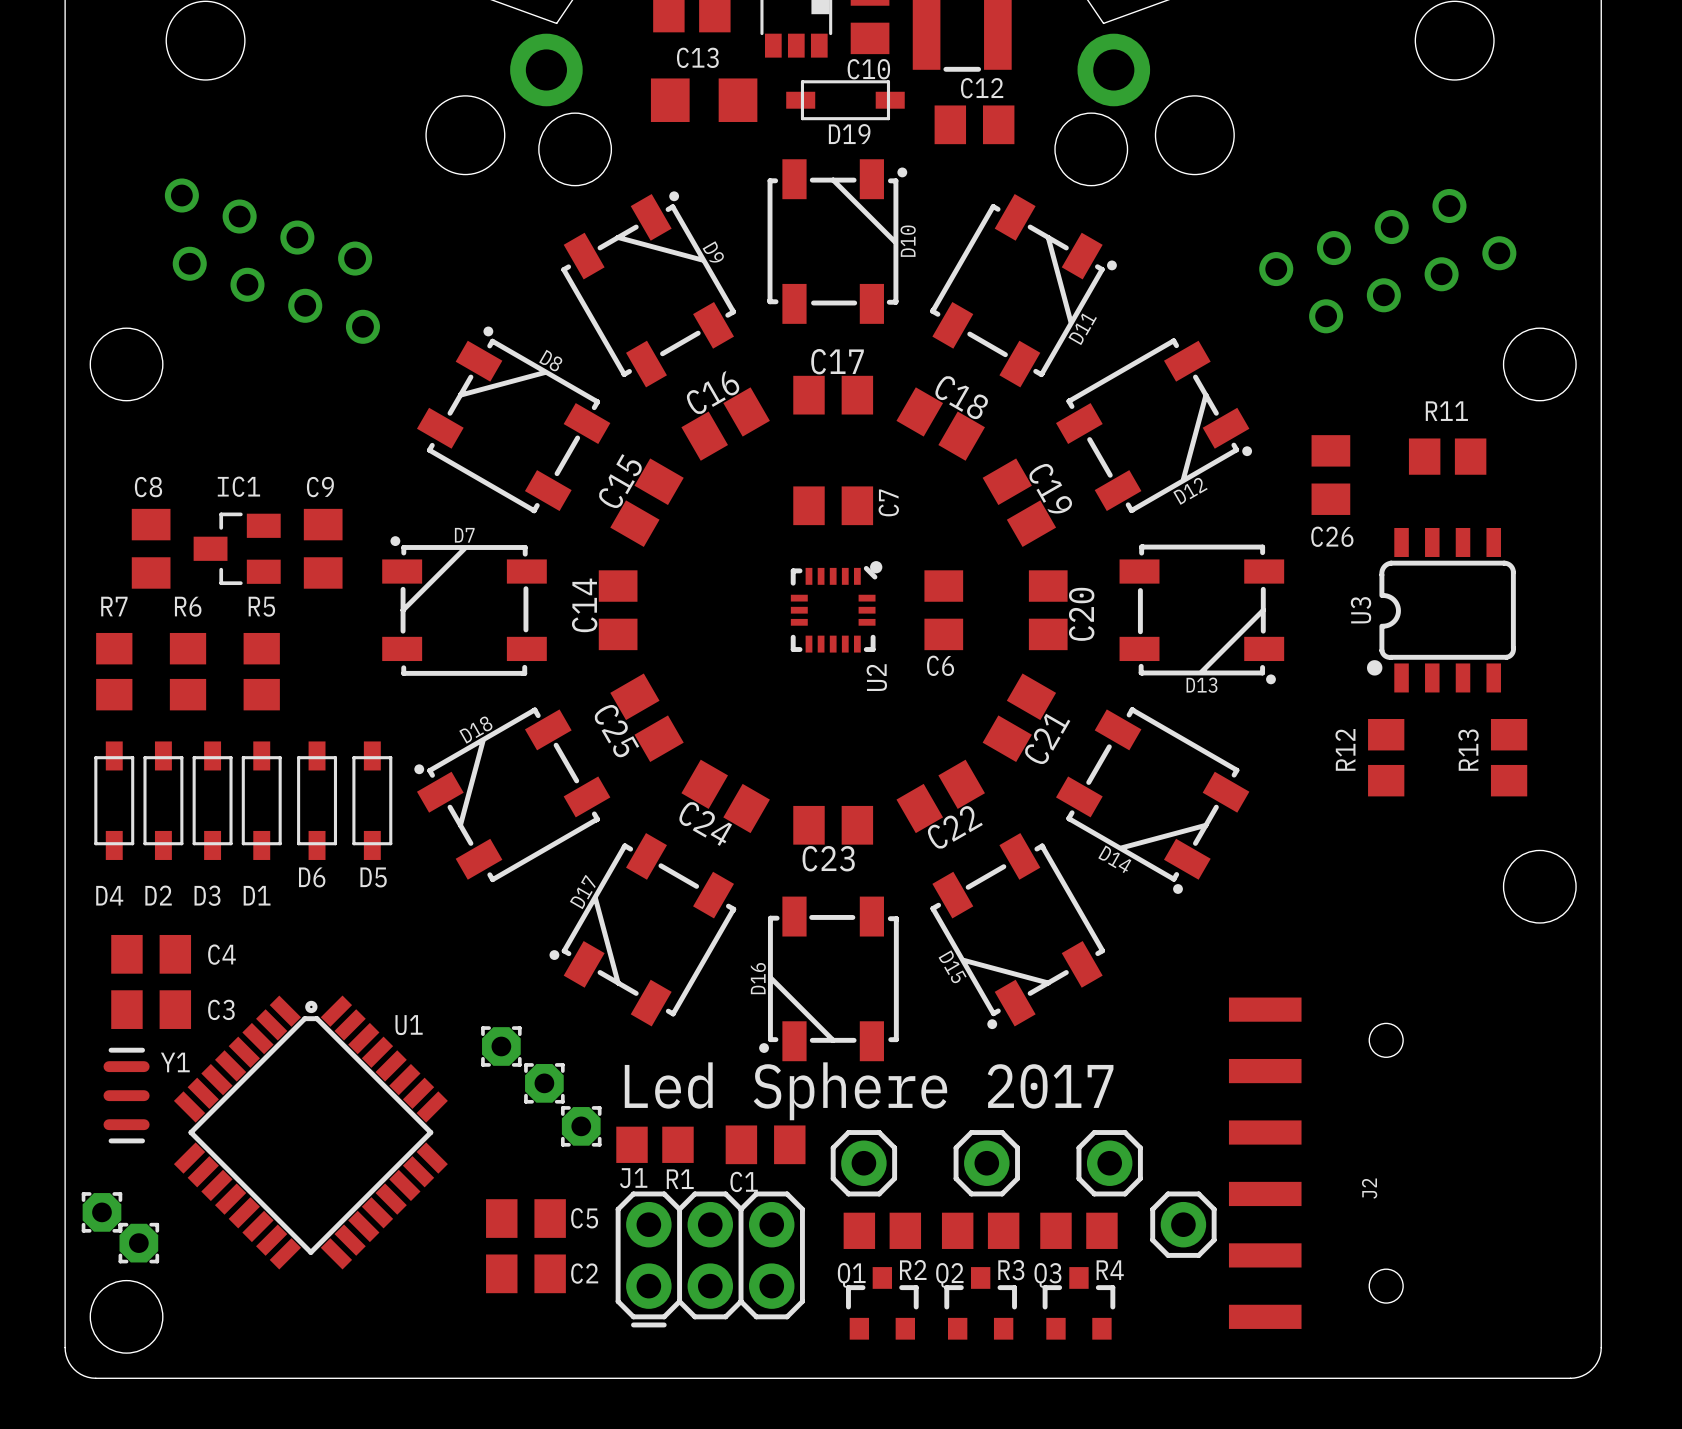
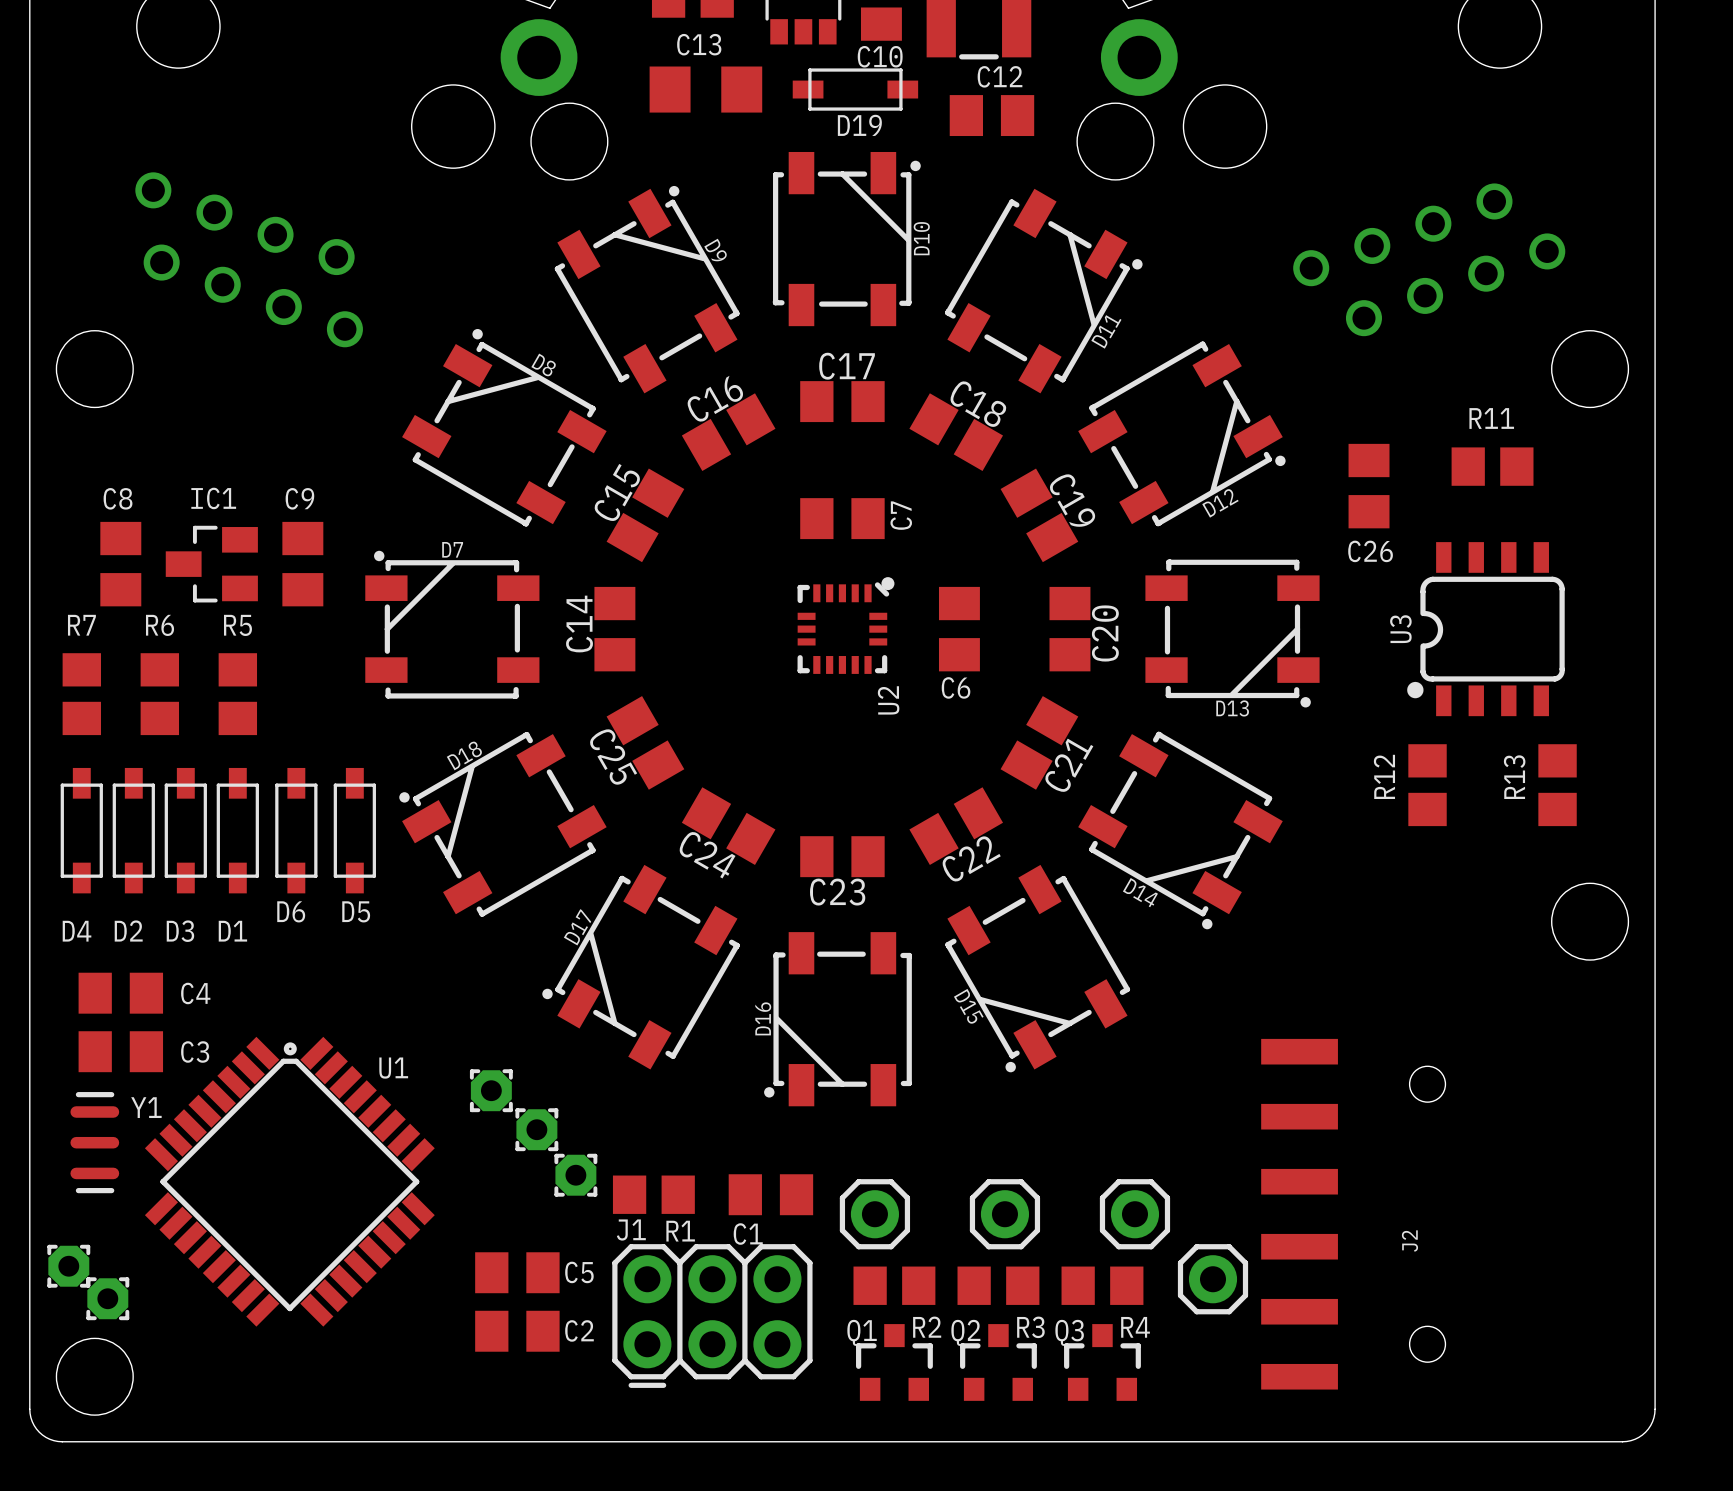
text: Led Sphere 2017 (869, 1091) -> none

